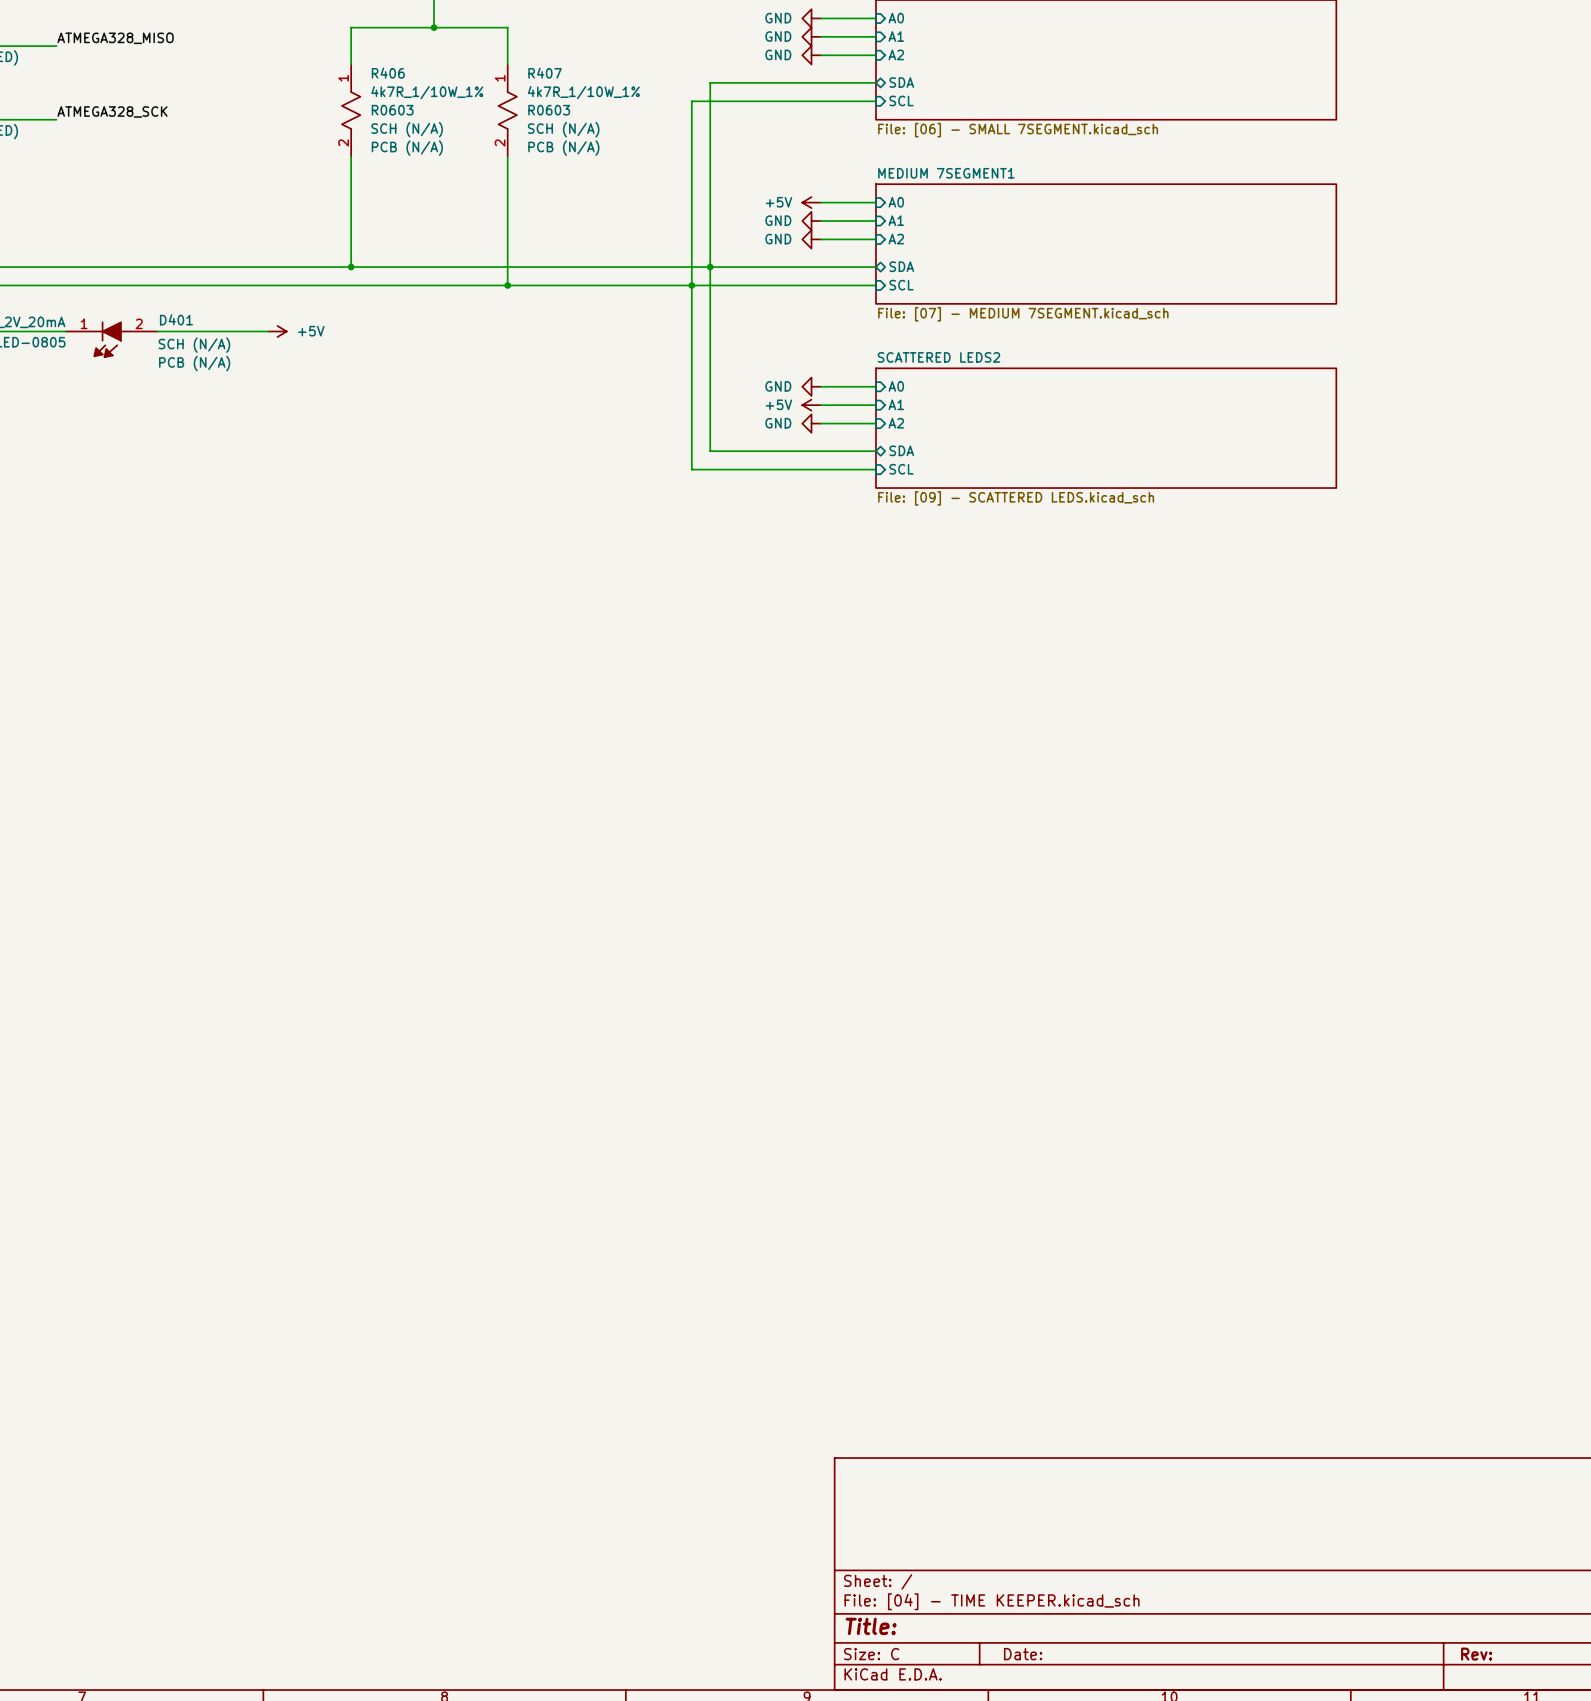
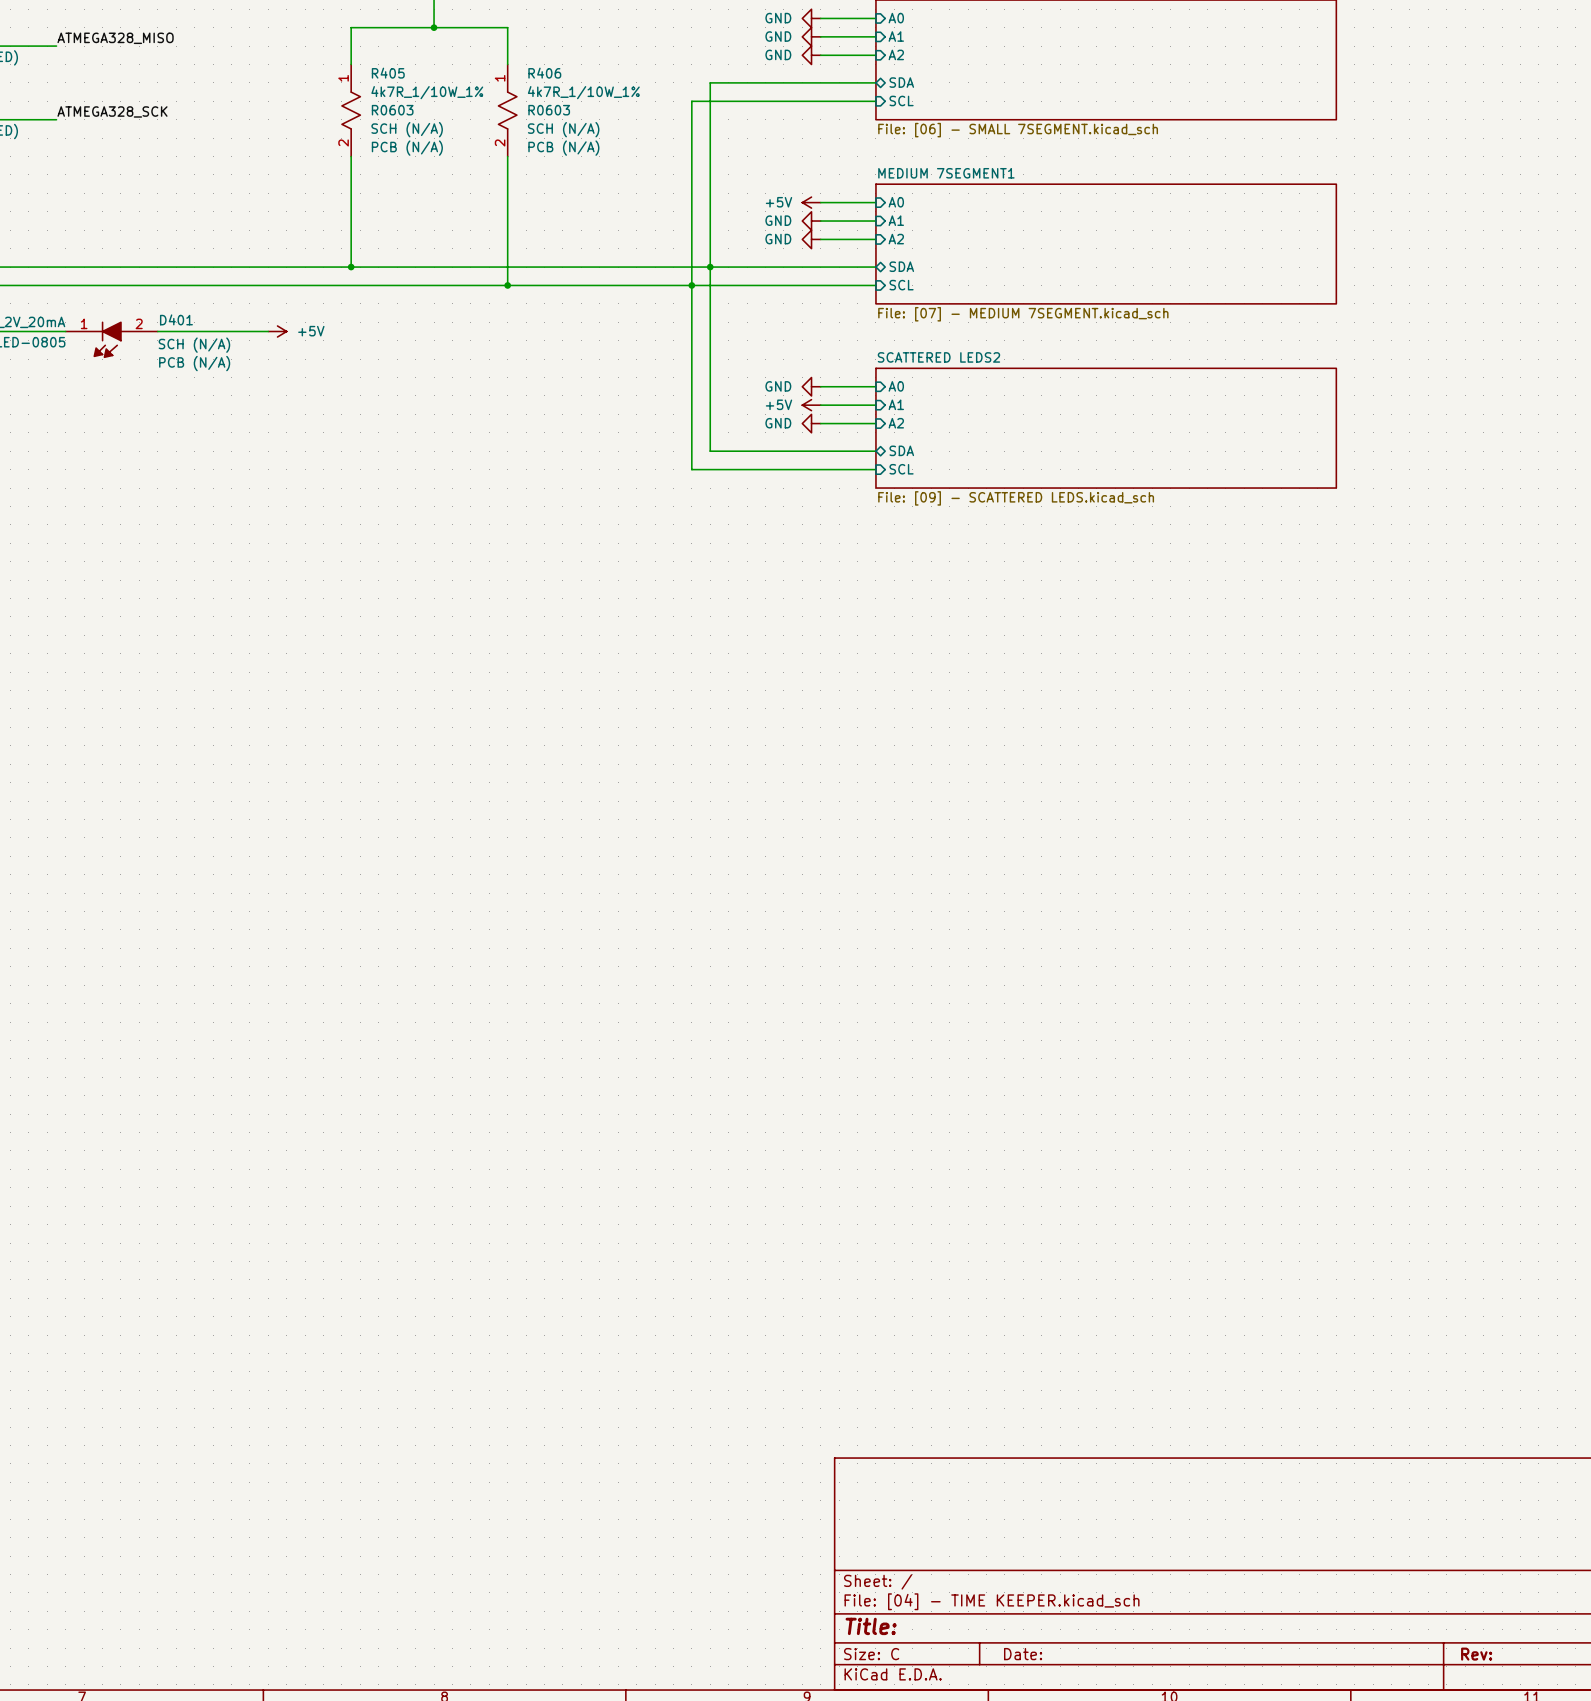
R406 name: R406 (388, 73) -> R405 (388, 73)
R407 name: R407 (545, 73) -> R406 (544, 73)

